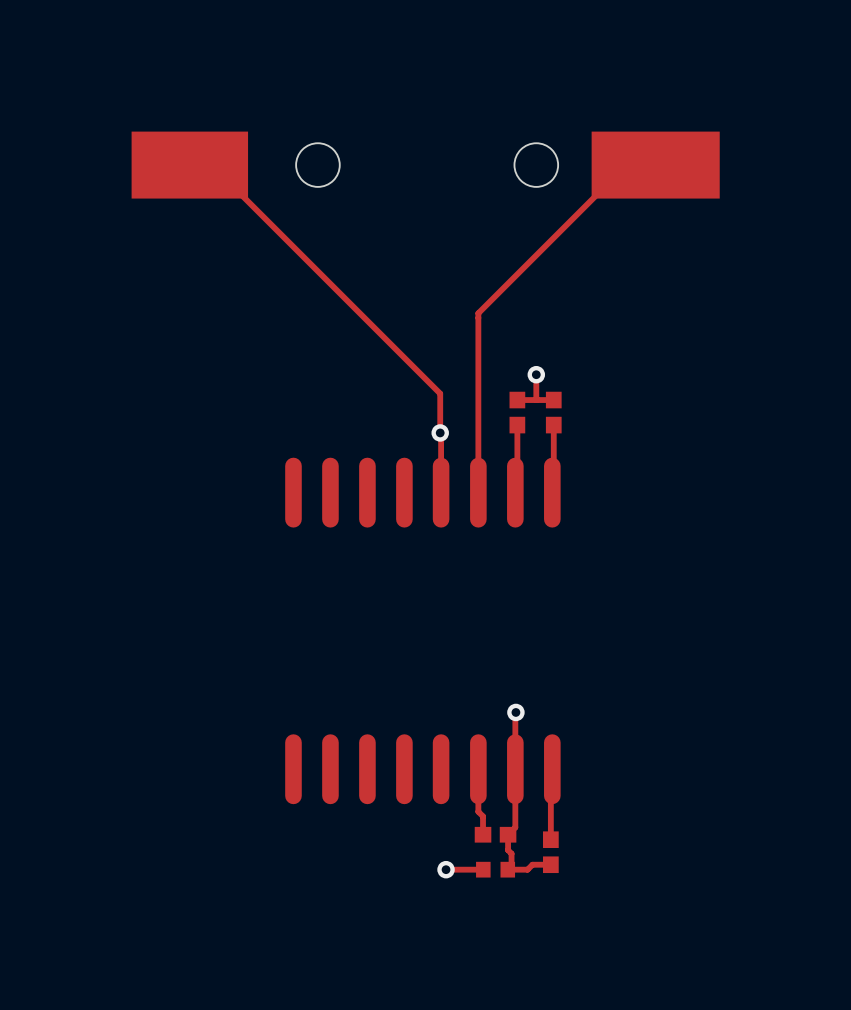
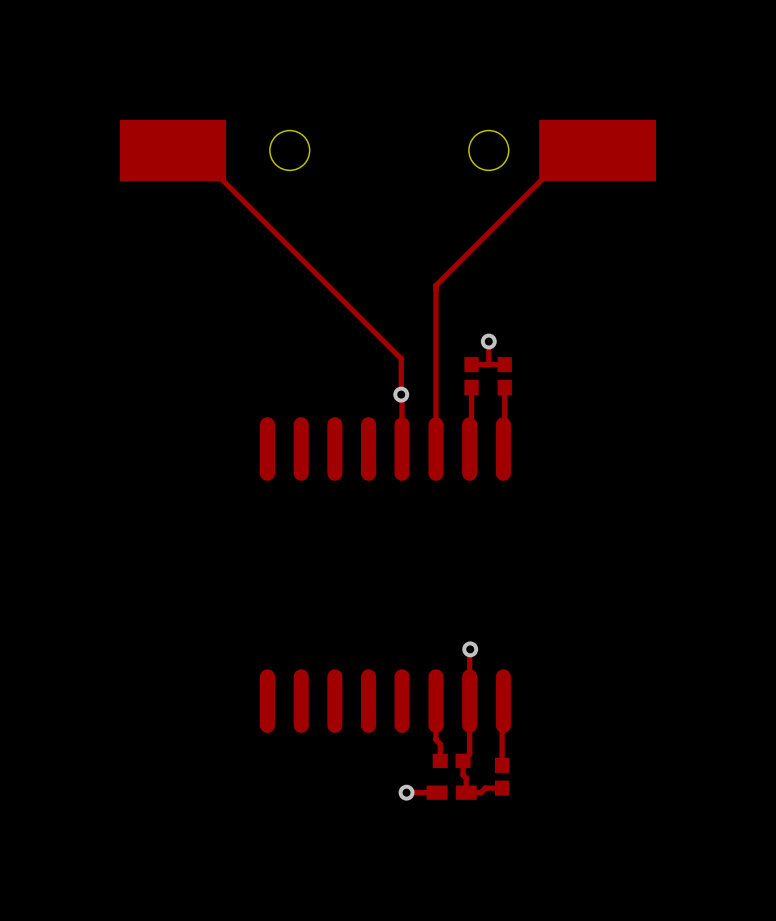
part footprint: [476, 861, 516, 878] -> [426, 785, 477, 800]

